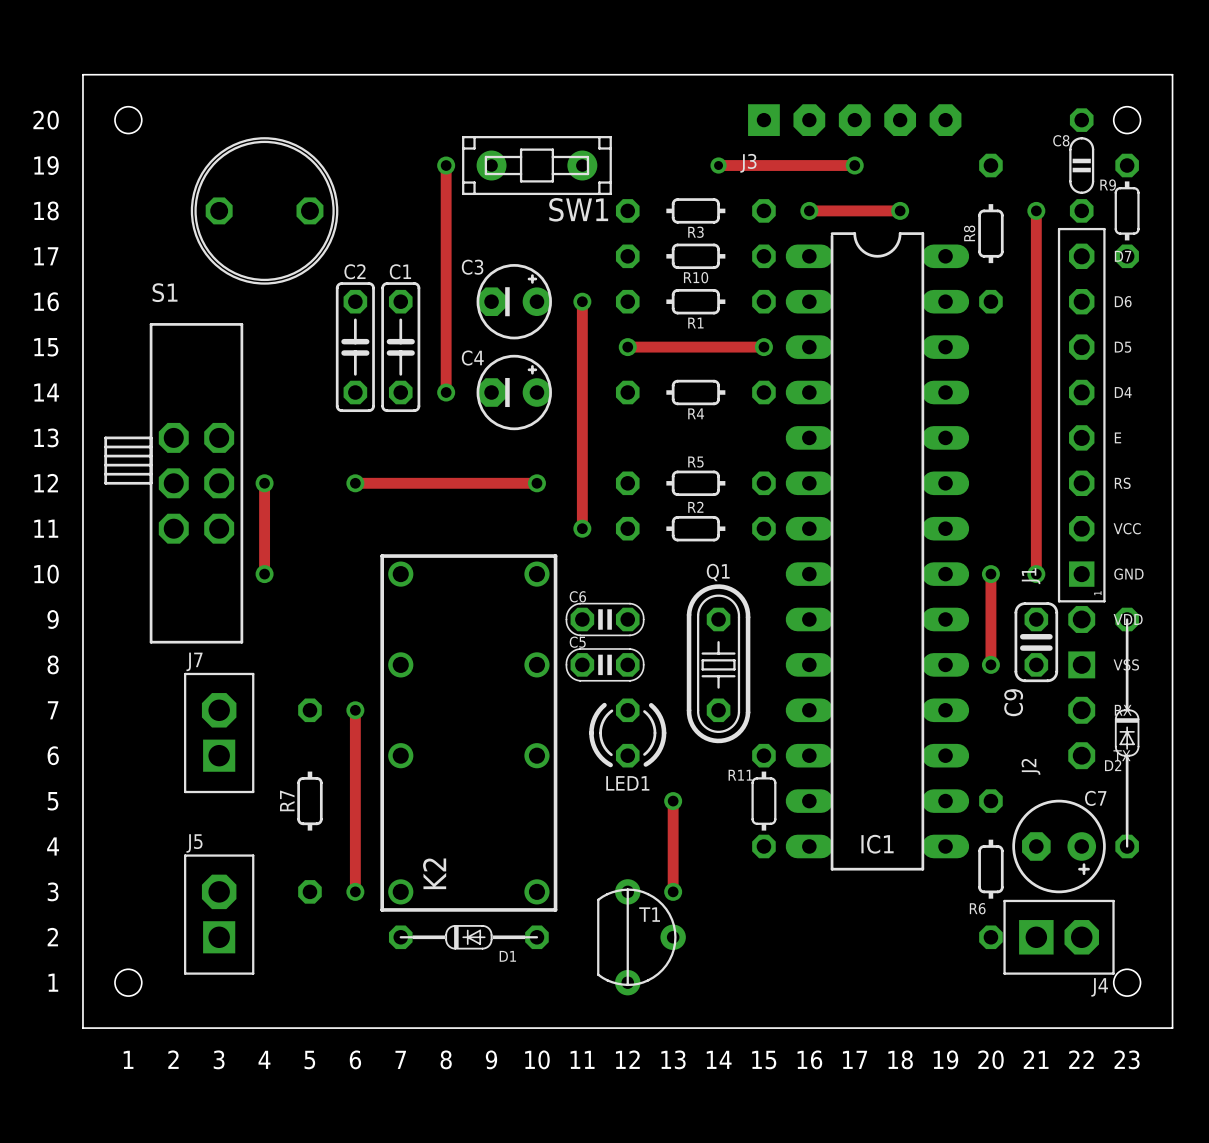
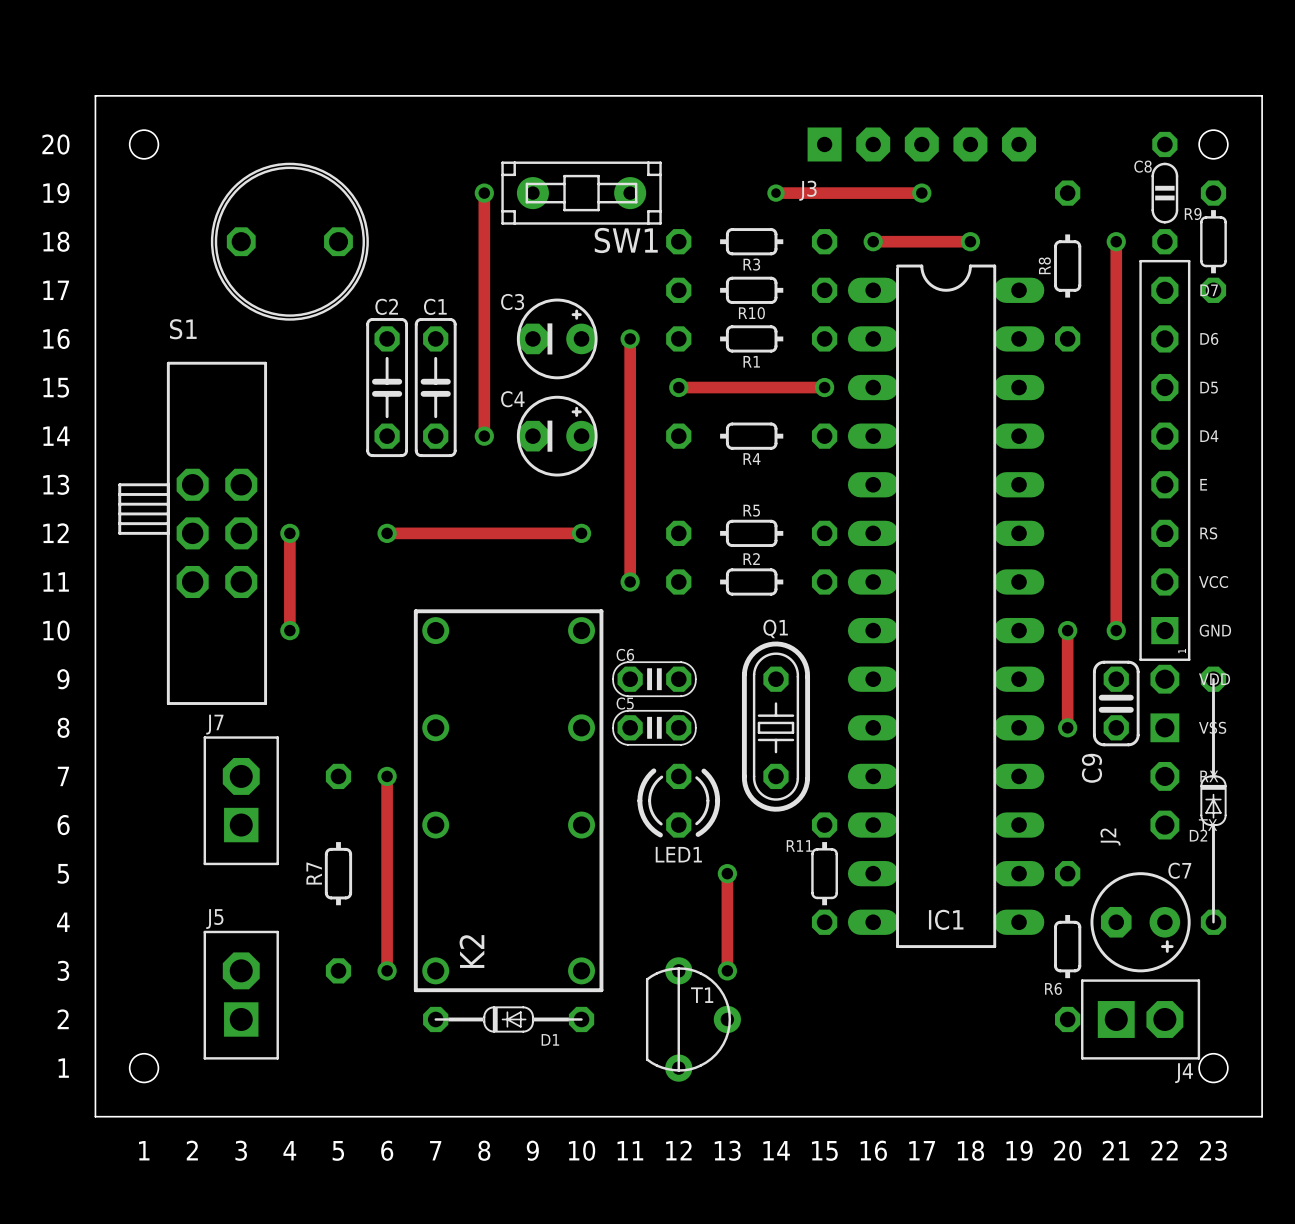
J1 name: J1 (1031, 576) -> none

